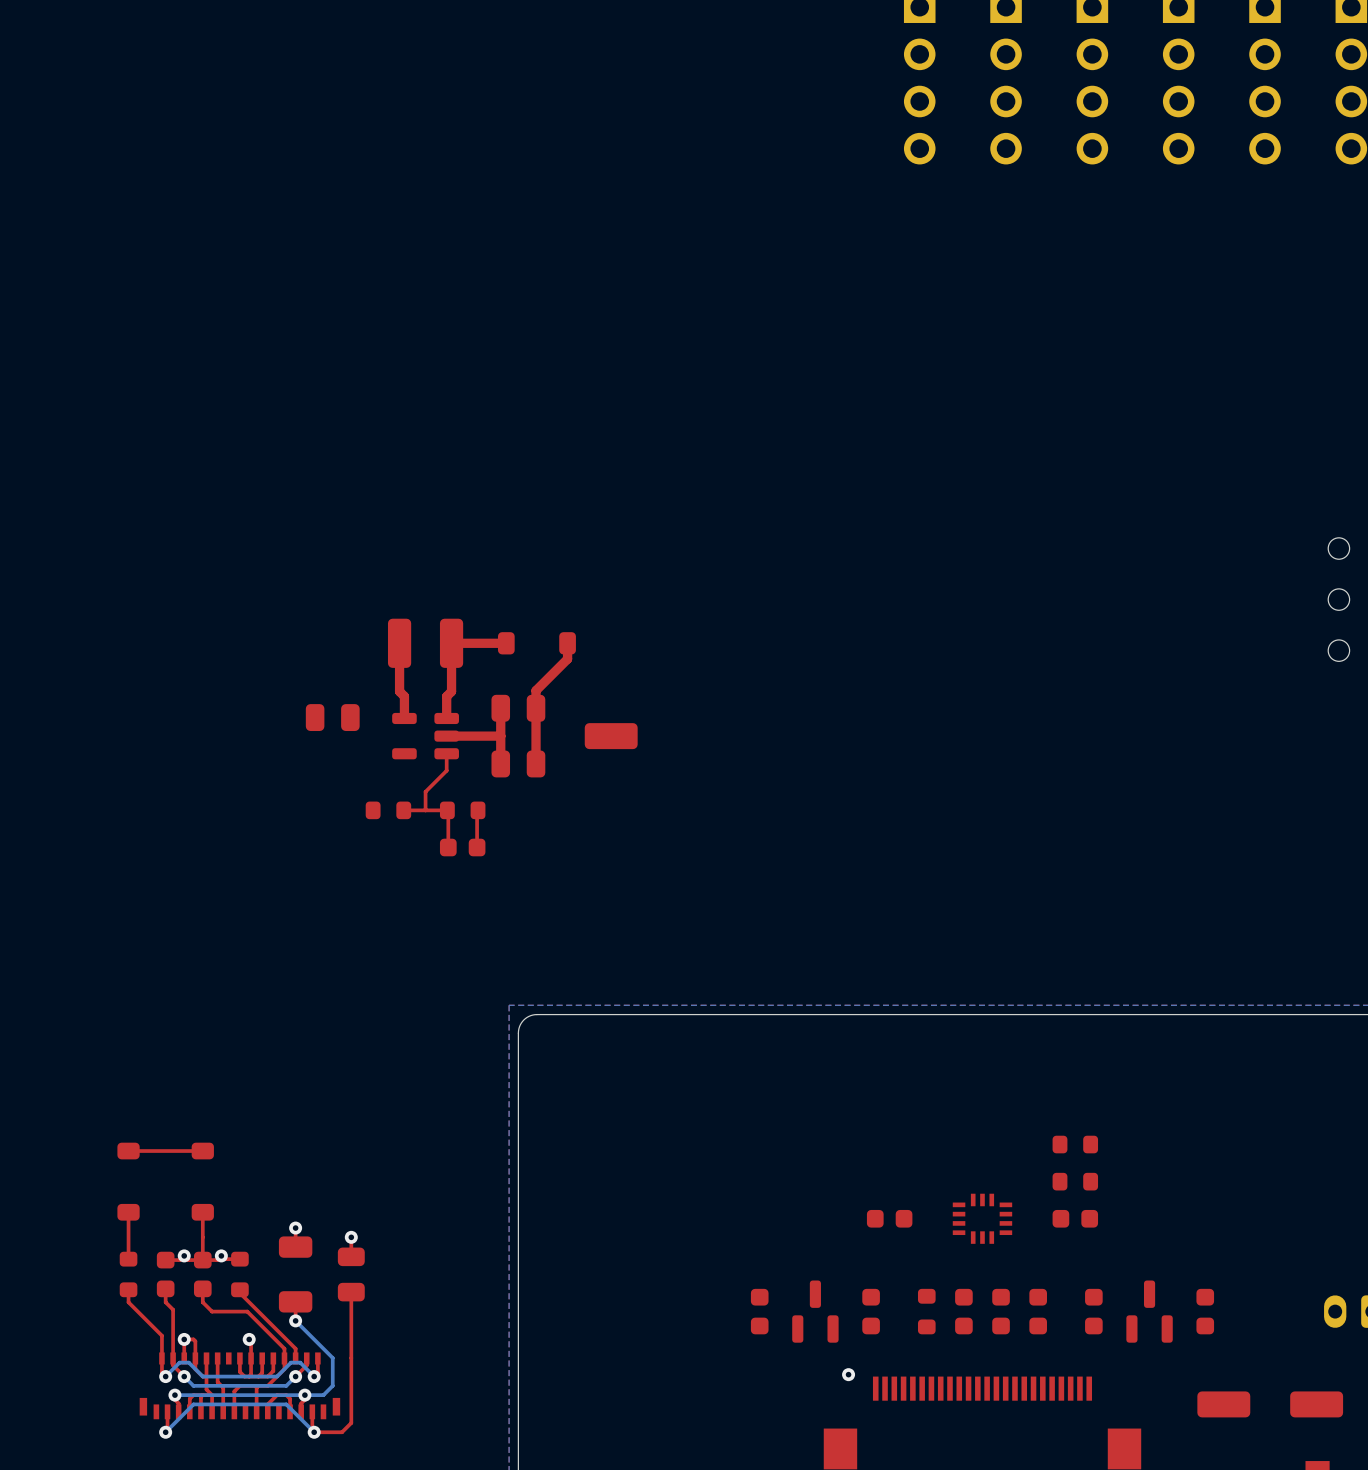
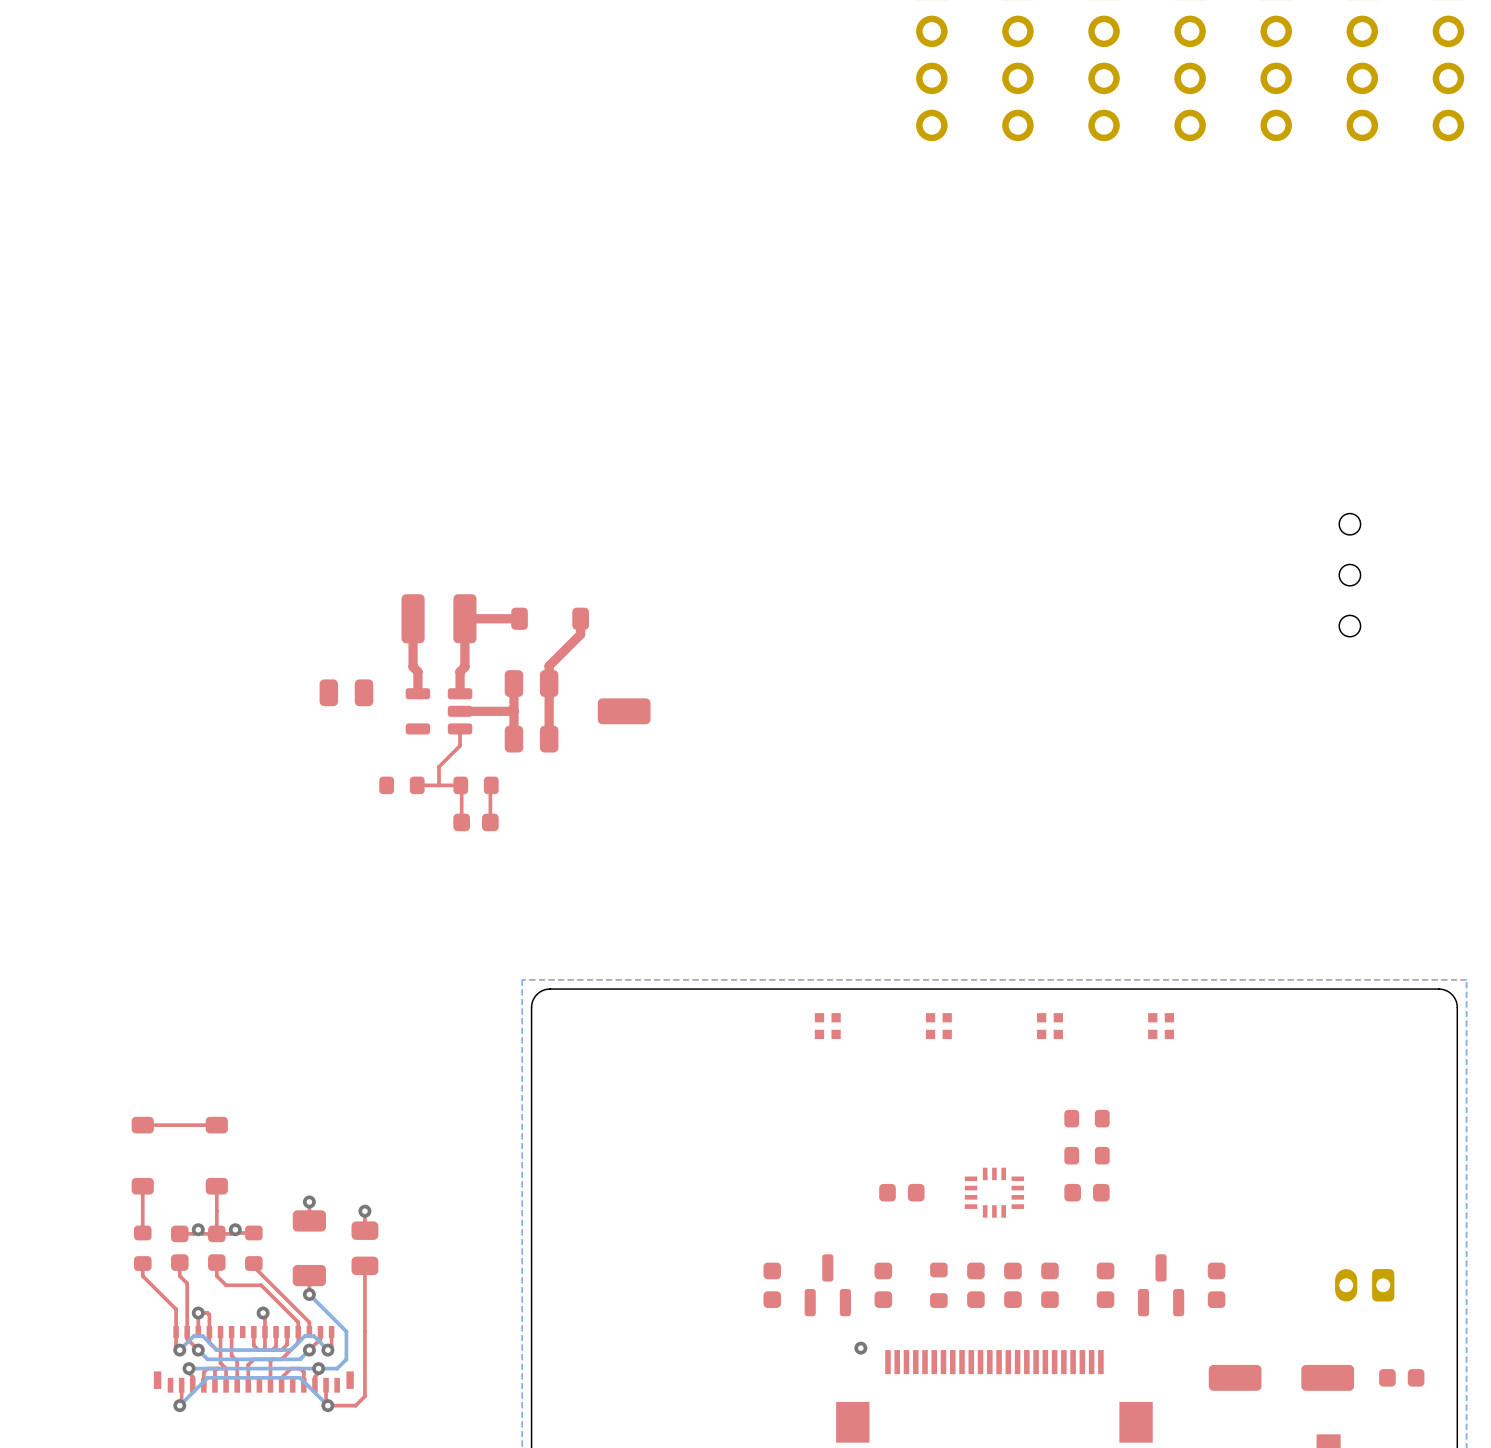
part: none -> (827, 1026)
part: none -> (938, 1026)
part: none -> (1049, 1026)
part: none -> (1161, 1026)

